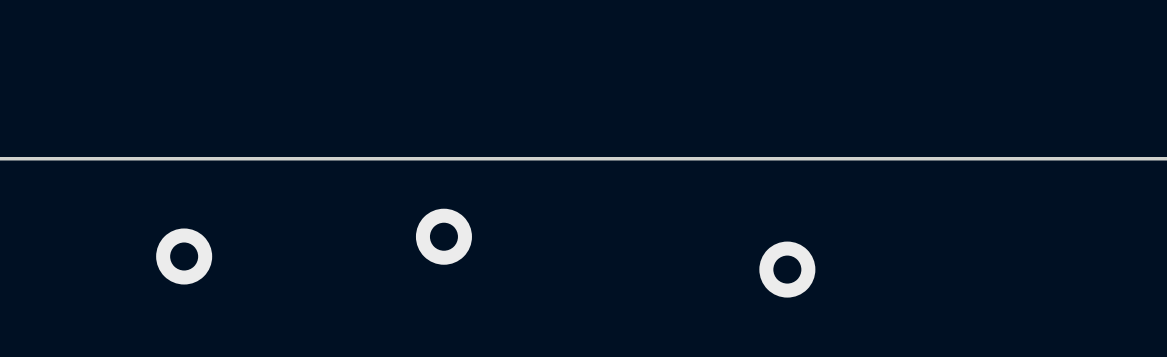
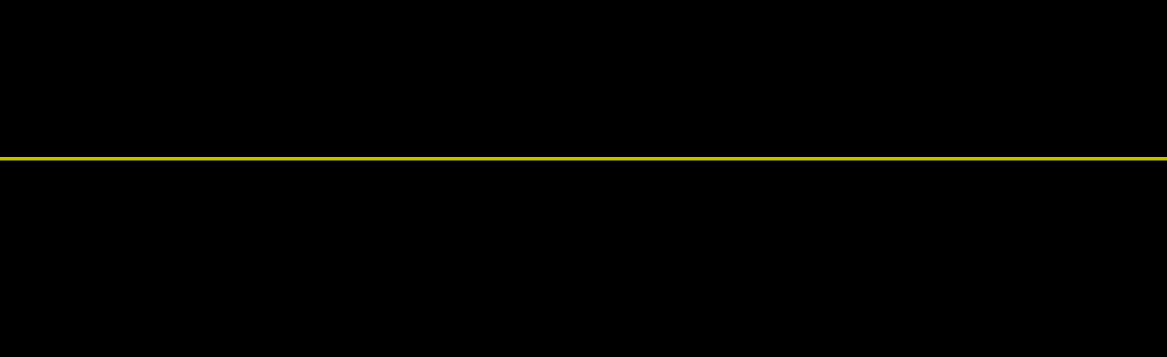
via: (443, 236) -> none
via: (184, 256) -> none
via: (787, 269) -> none

